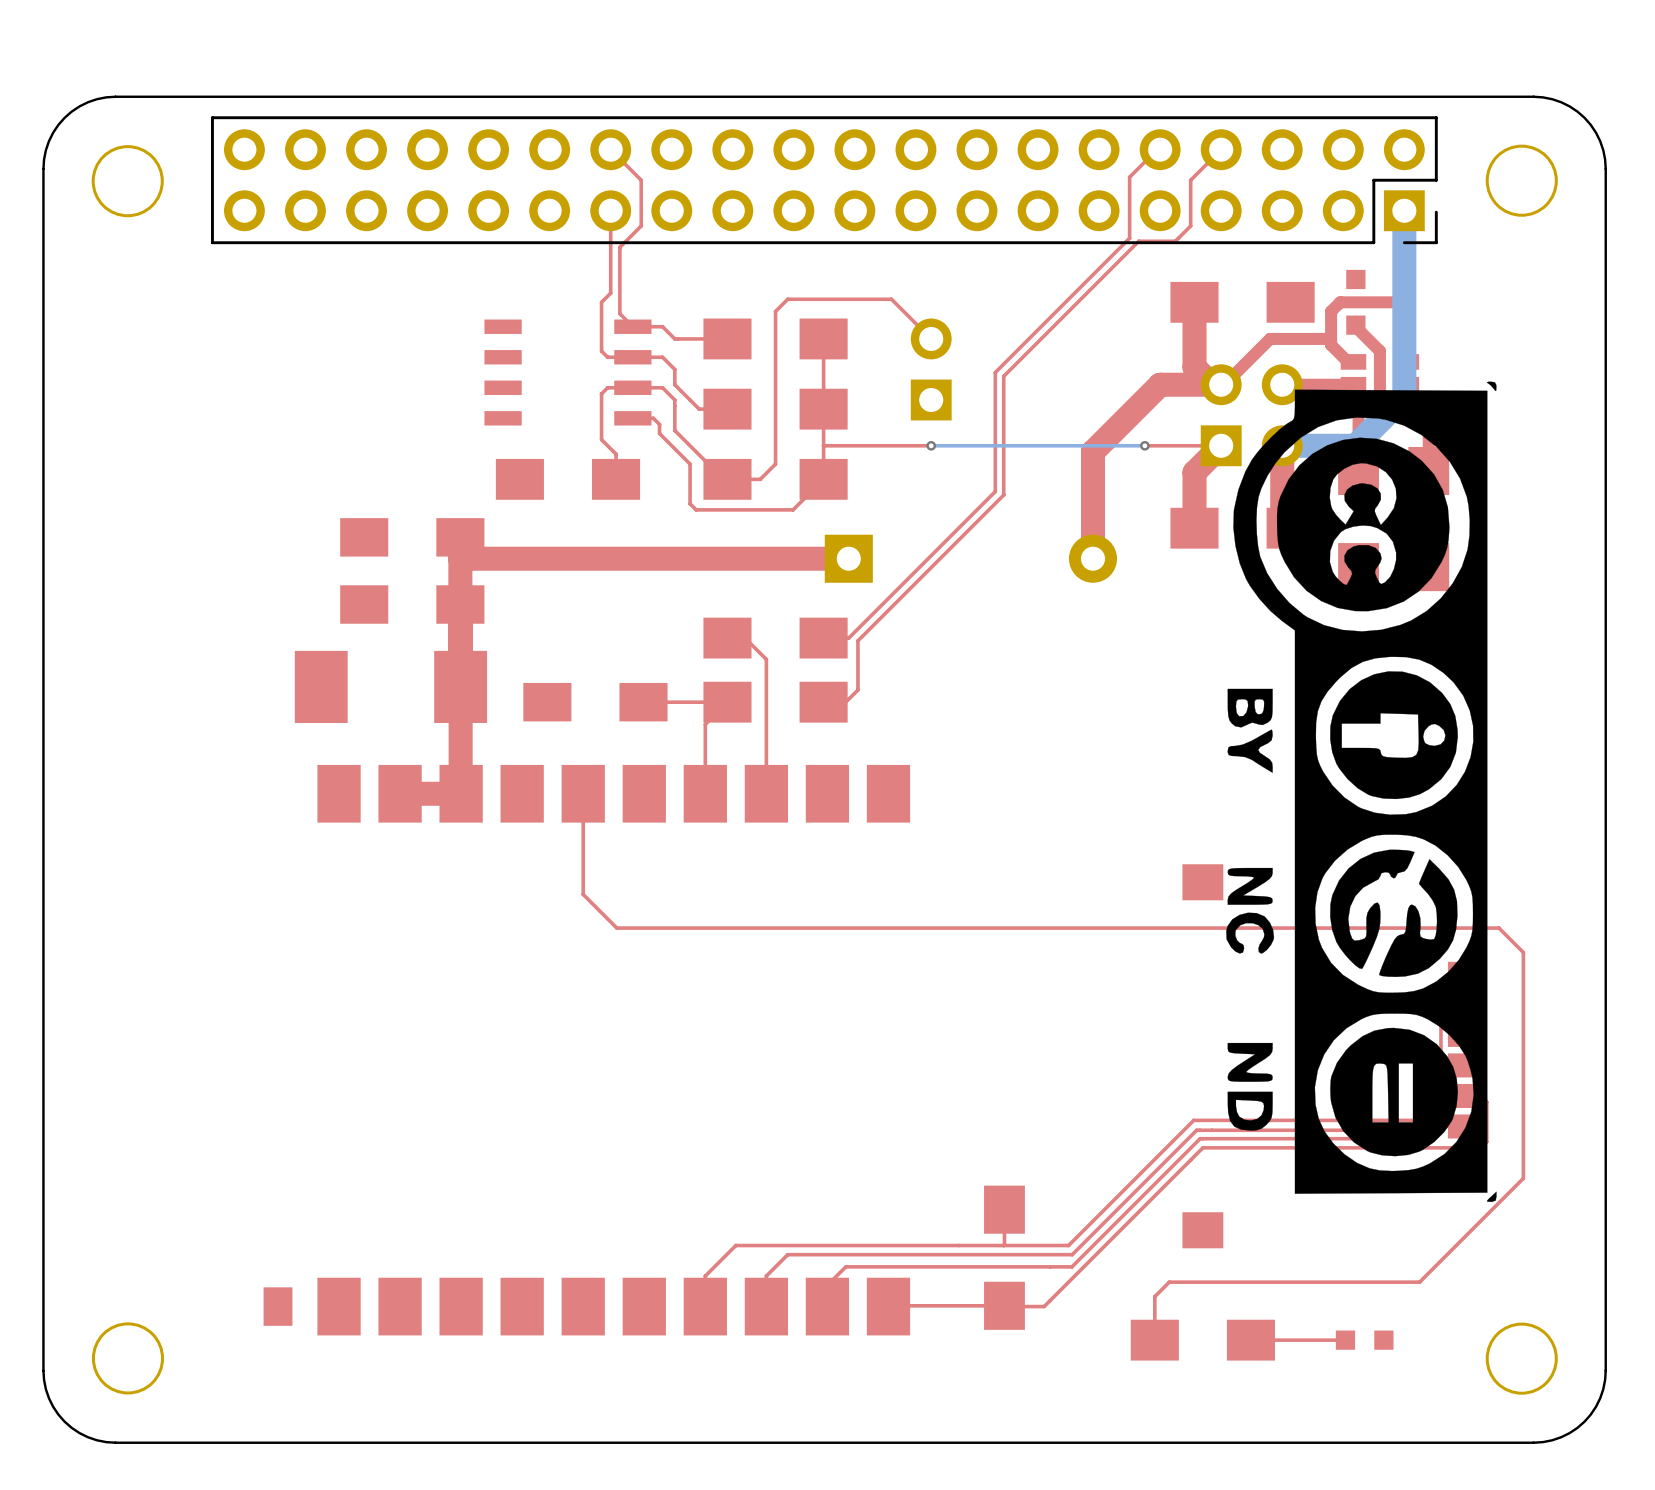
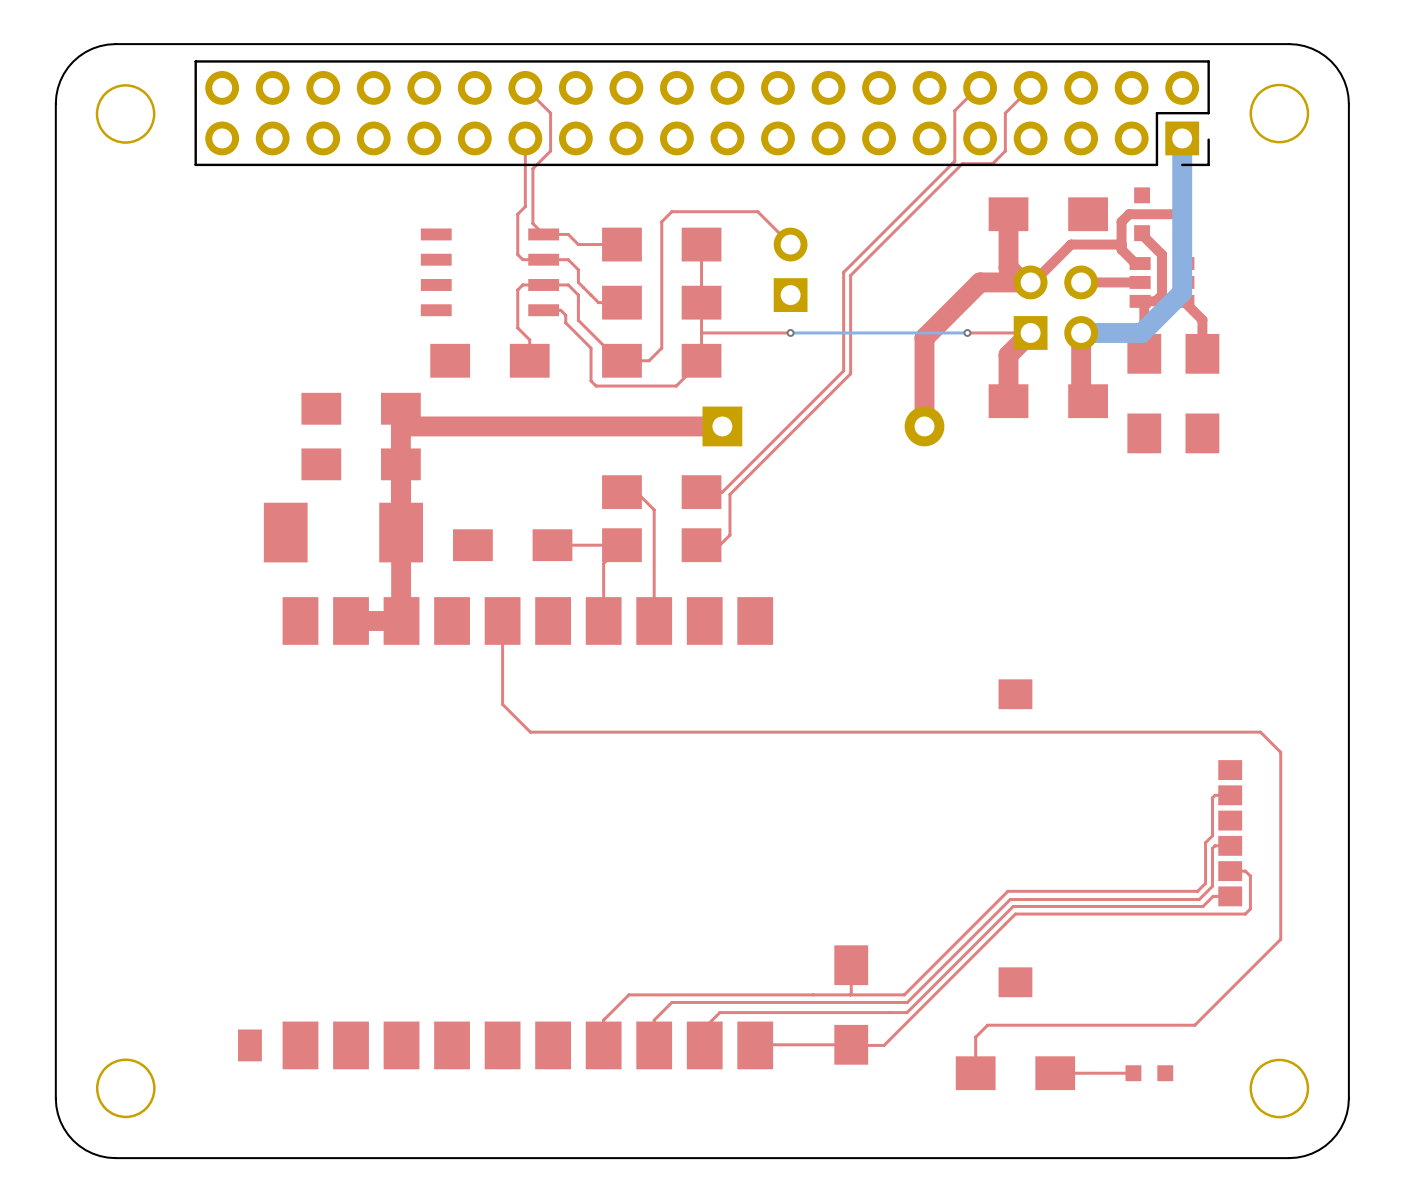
drawing: [1226, 381, 1497, 1202] -> none

